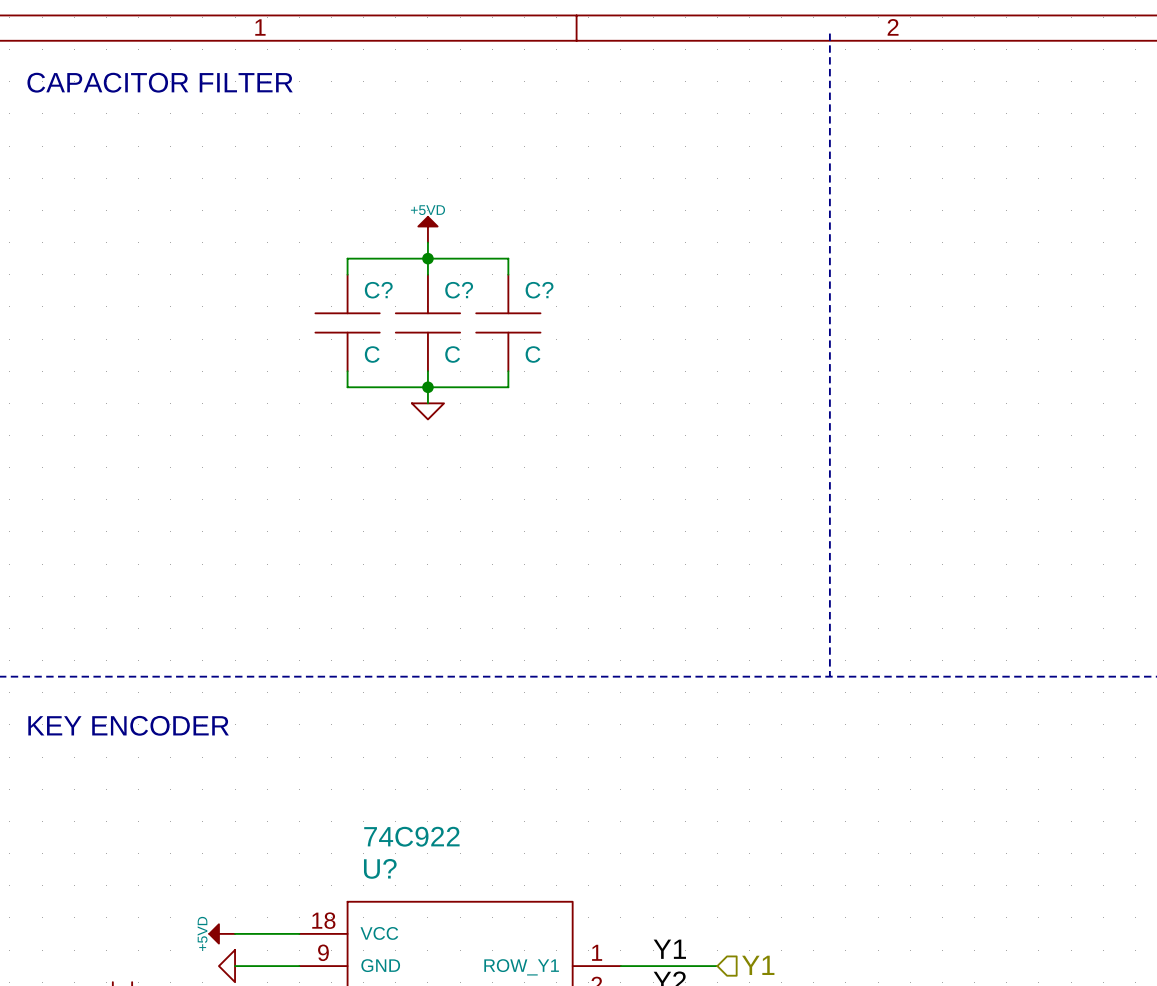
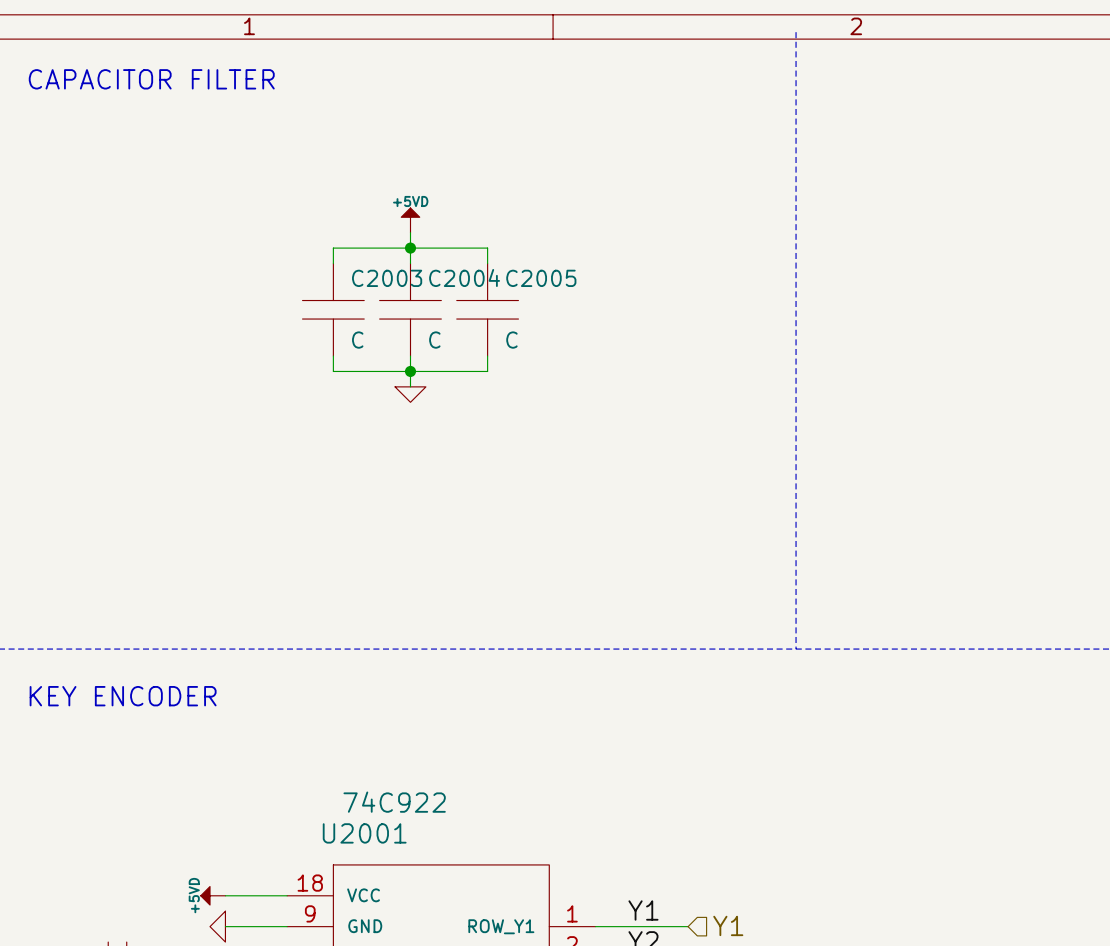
C? name: C? (378, 290) -> C2003 (387, 278)
C? name: C? (459, 290) -> C2004 (464, 277)
C? name: C? (539, 290) -> C2005 (541, 278)
U? name: U? (380, 868) -> U2001 (364, 833)

